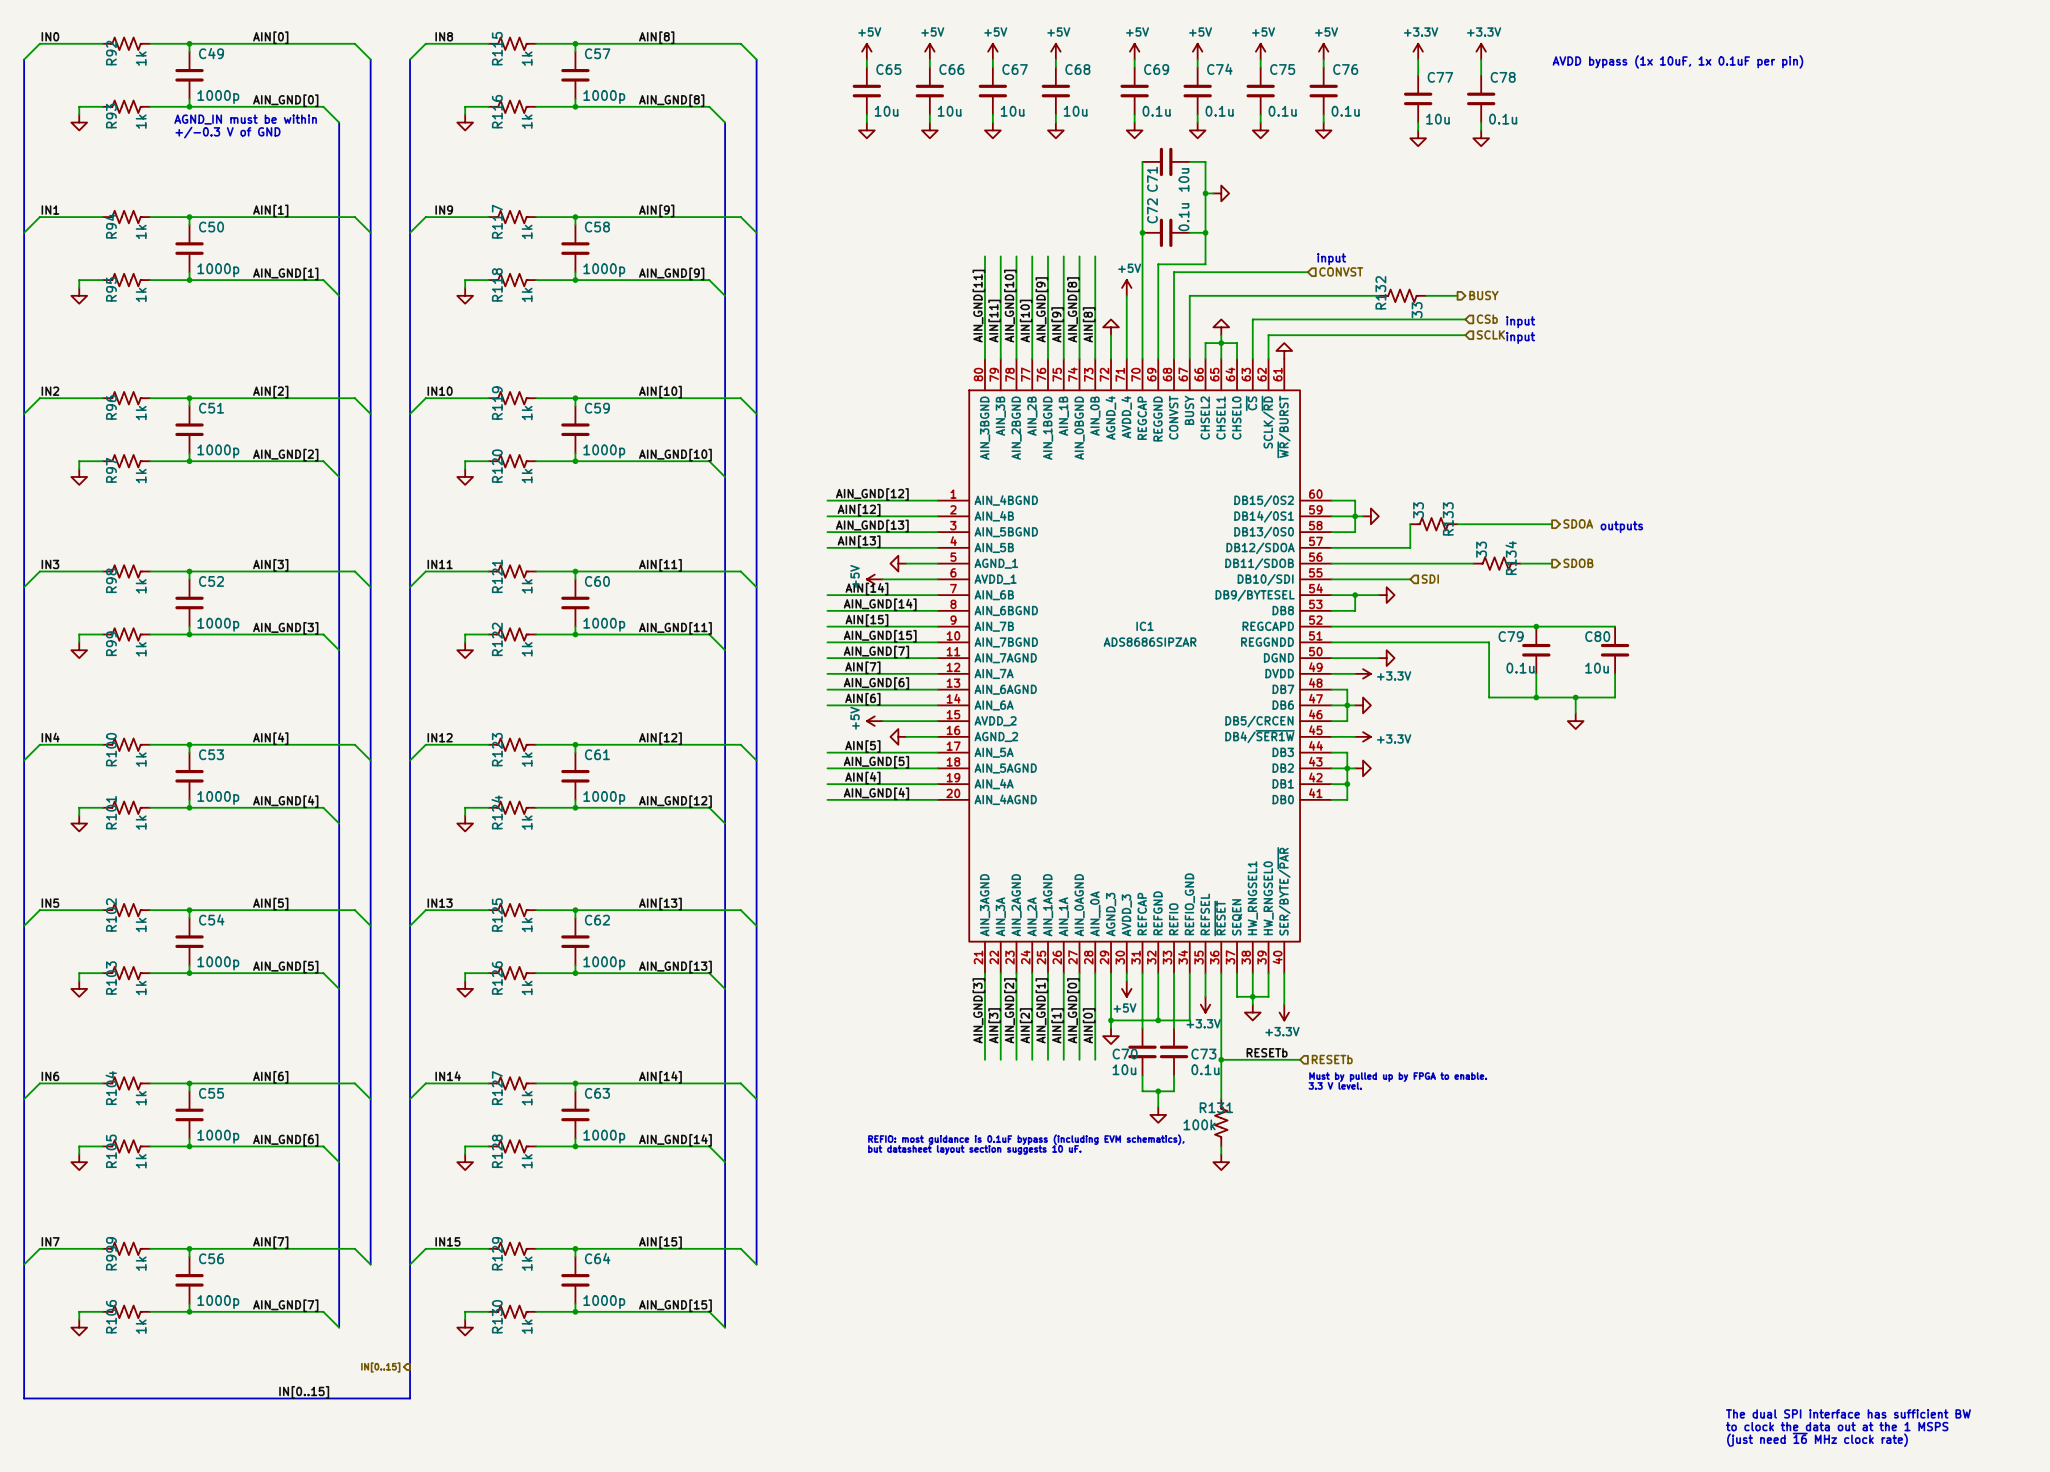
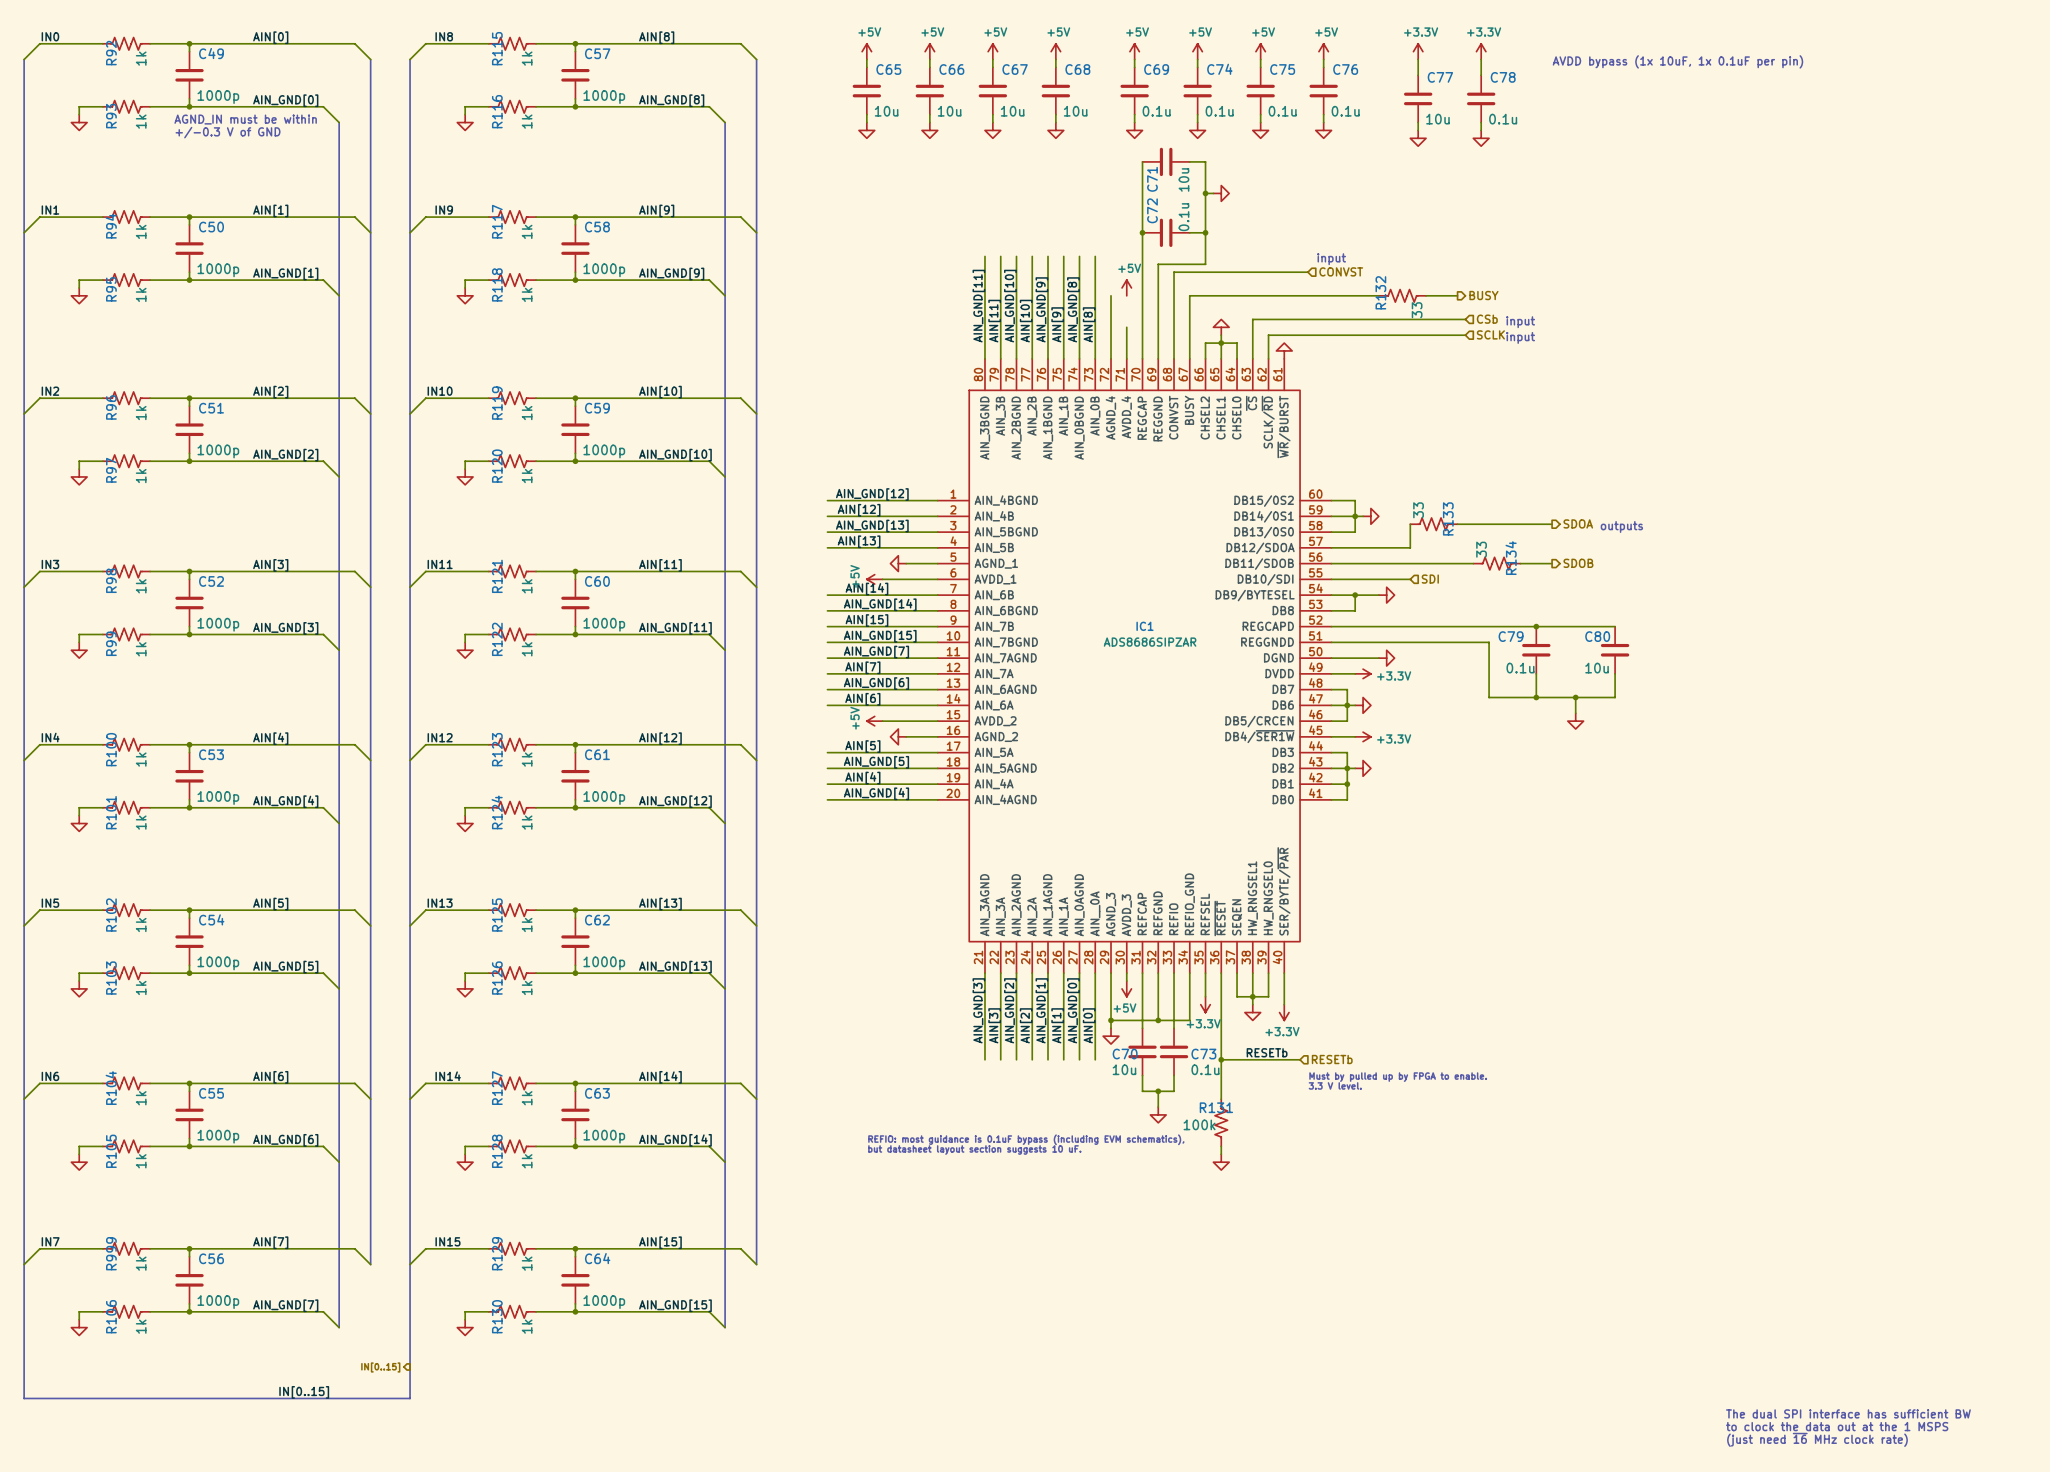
wire: none -> (1111, 295) (1111, 335)
wire: (1126, 295) (1126, 327) -> none
power symbol: (1111, 327) -> none

